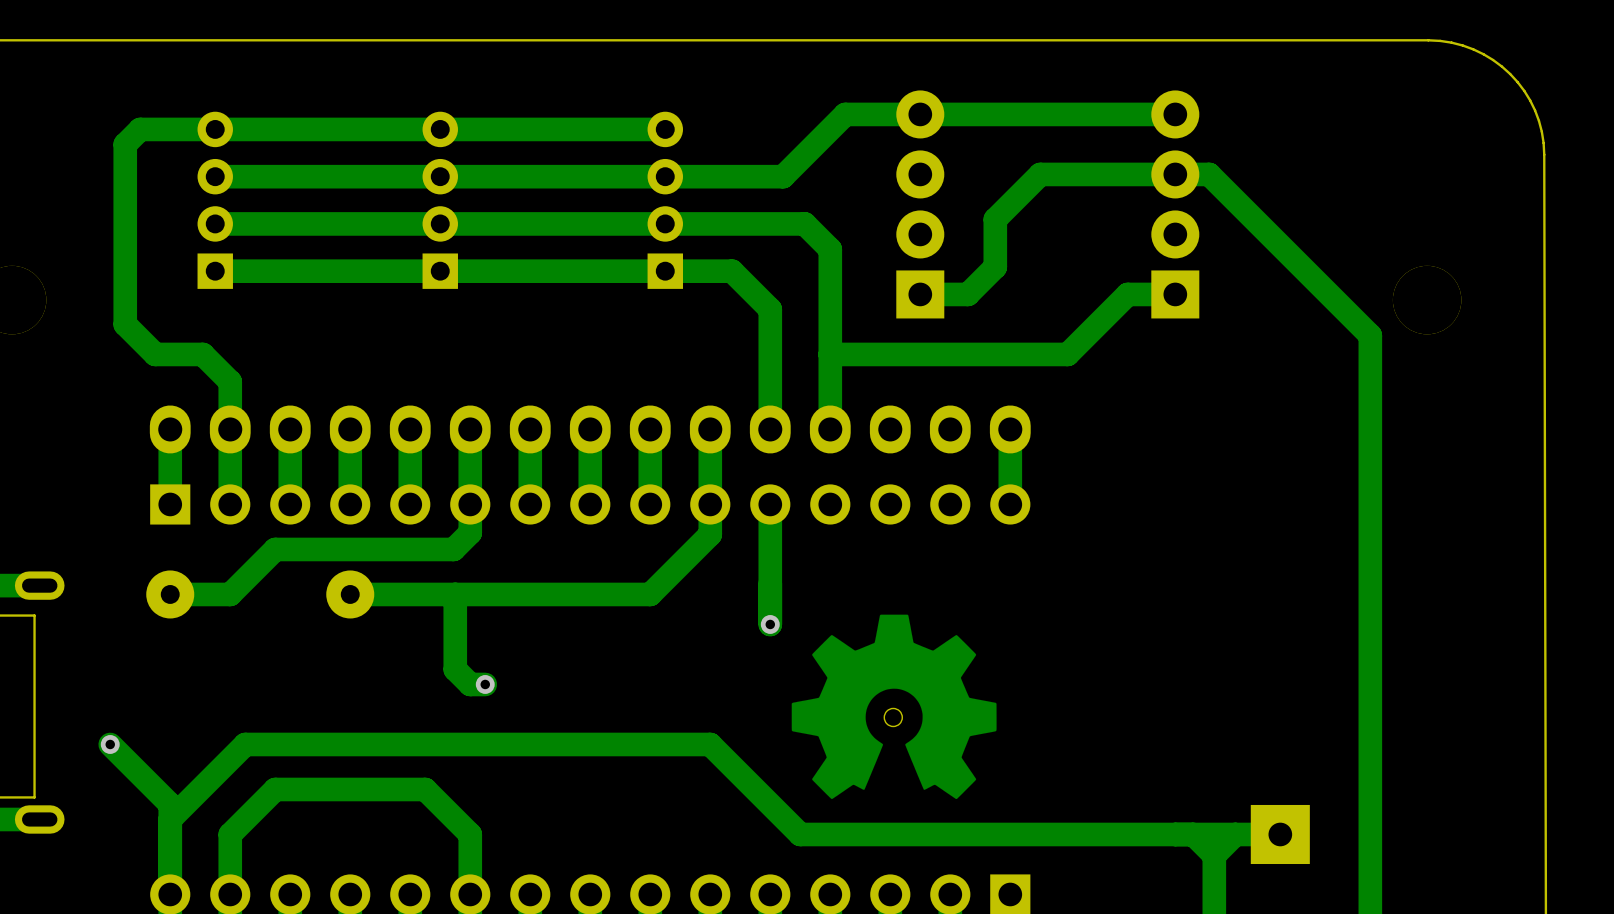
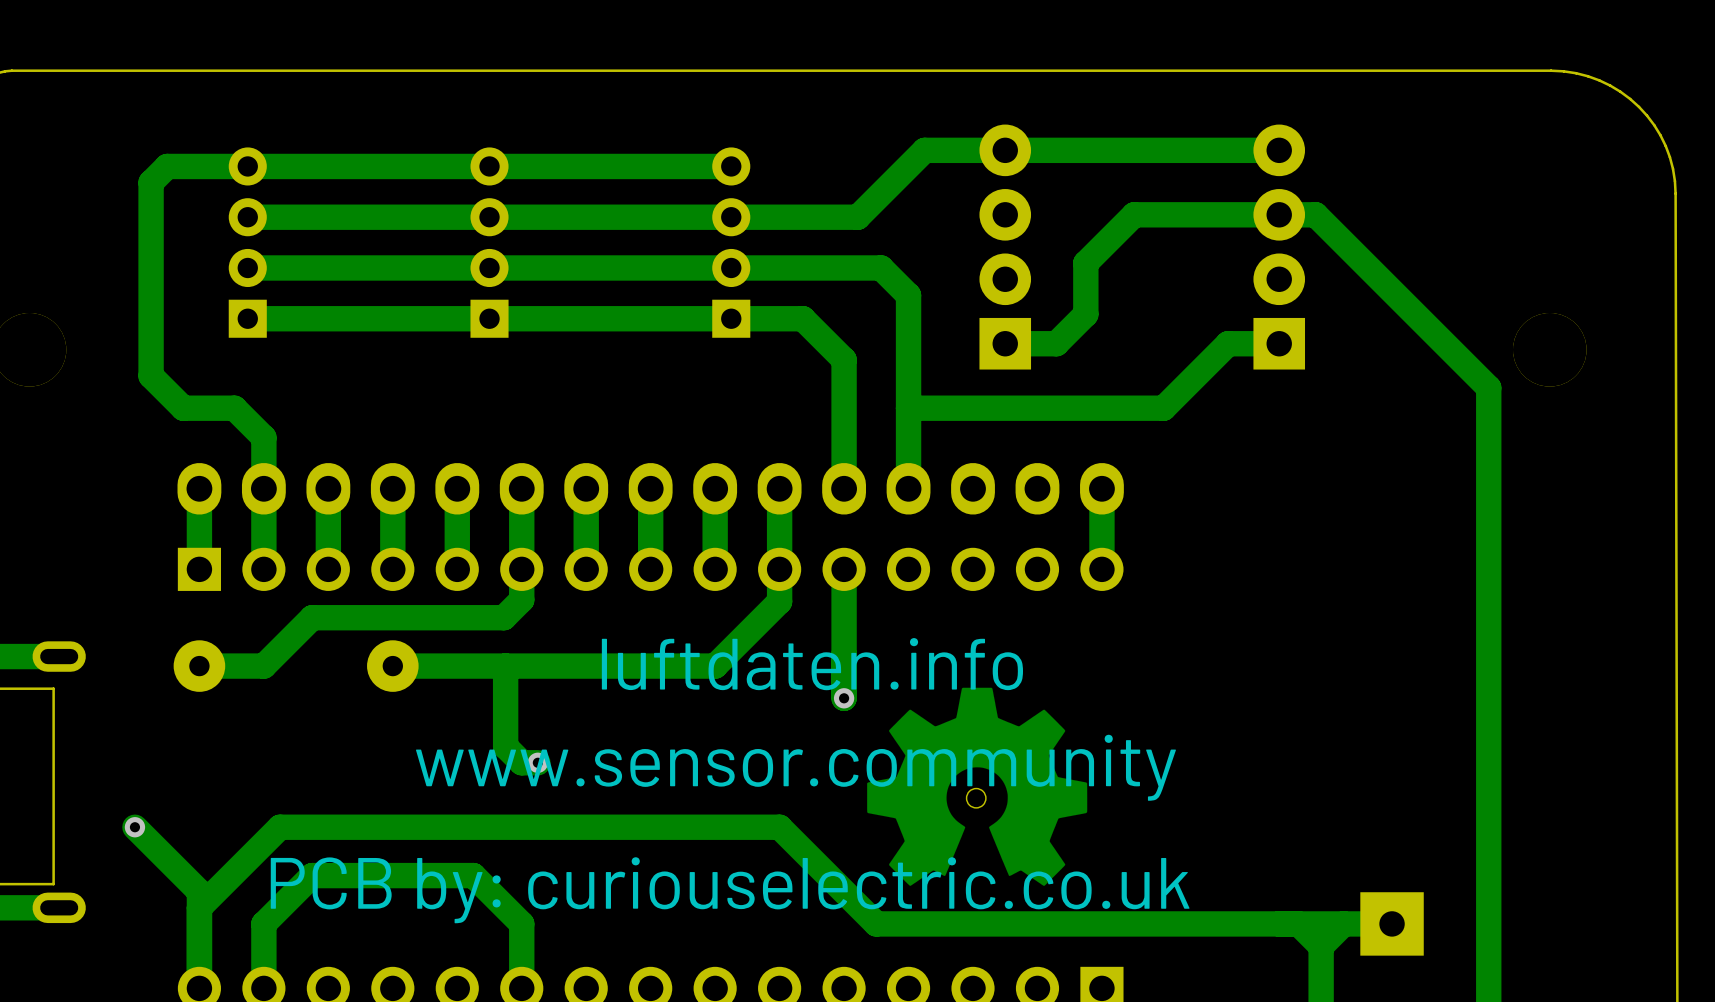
text: none -> luftdaten.info (812, 664)
text: none -> www.sensor.community (796, 767)
text: none -> PCB by: curiouselectric.co.uk (730, 890)

